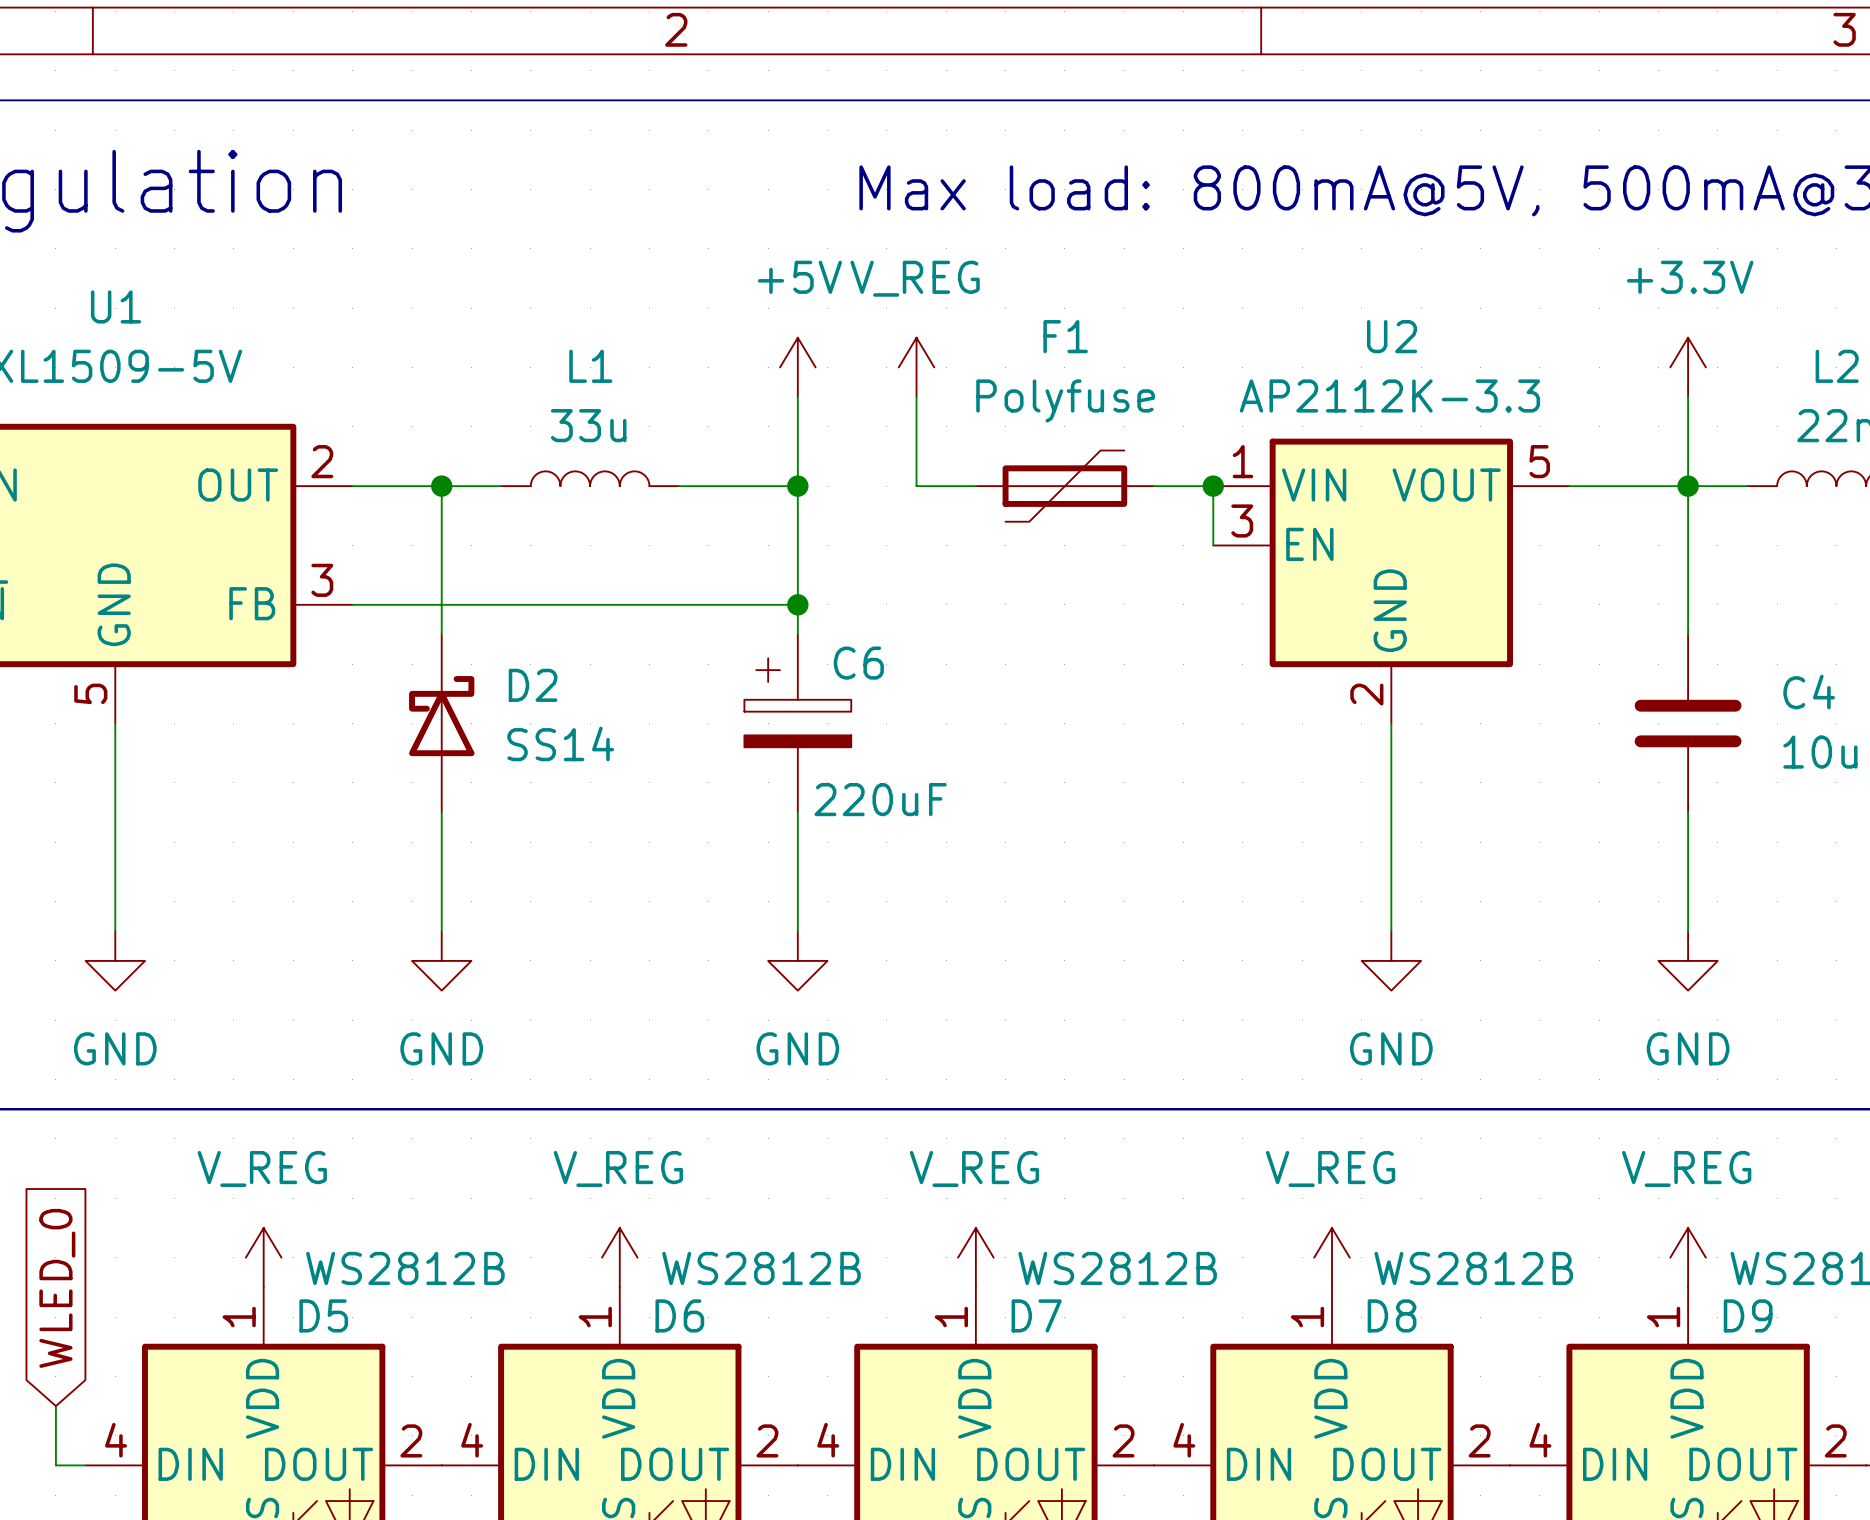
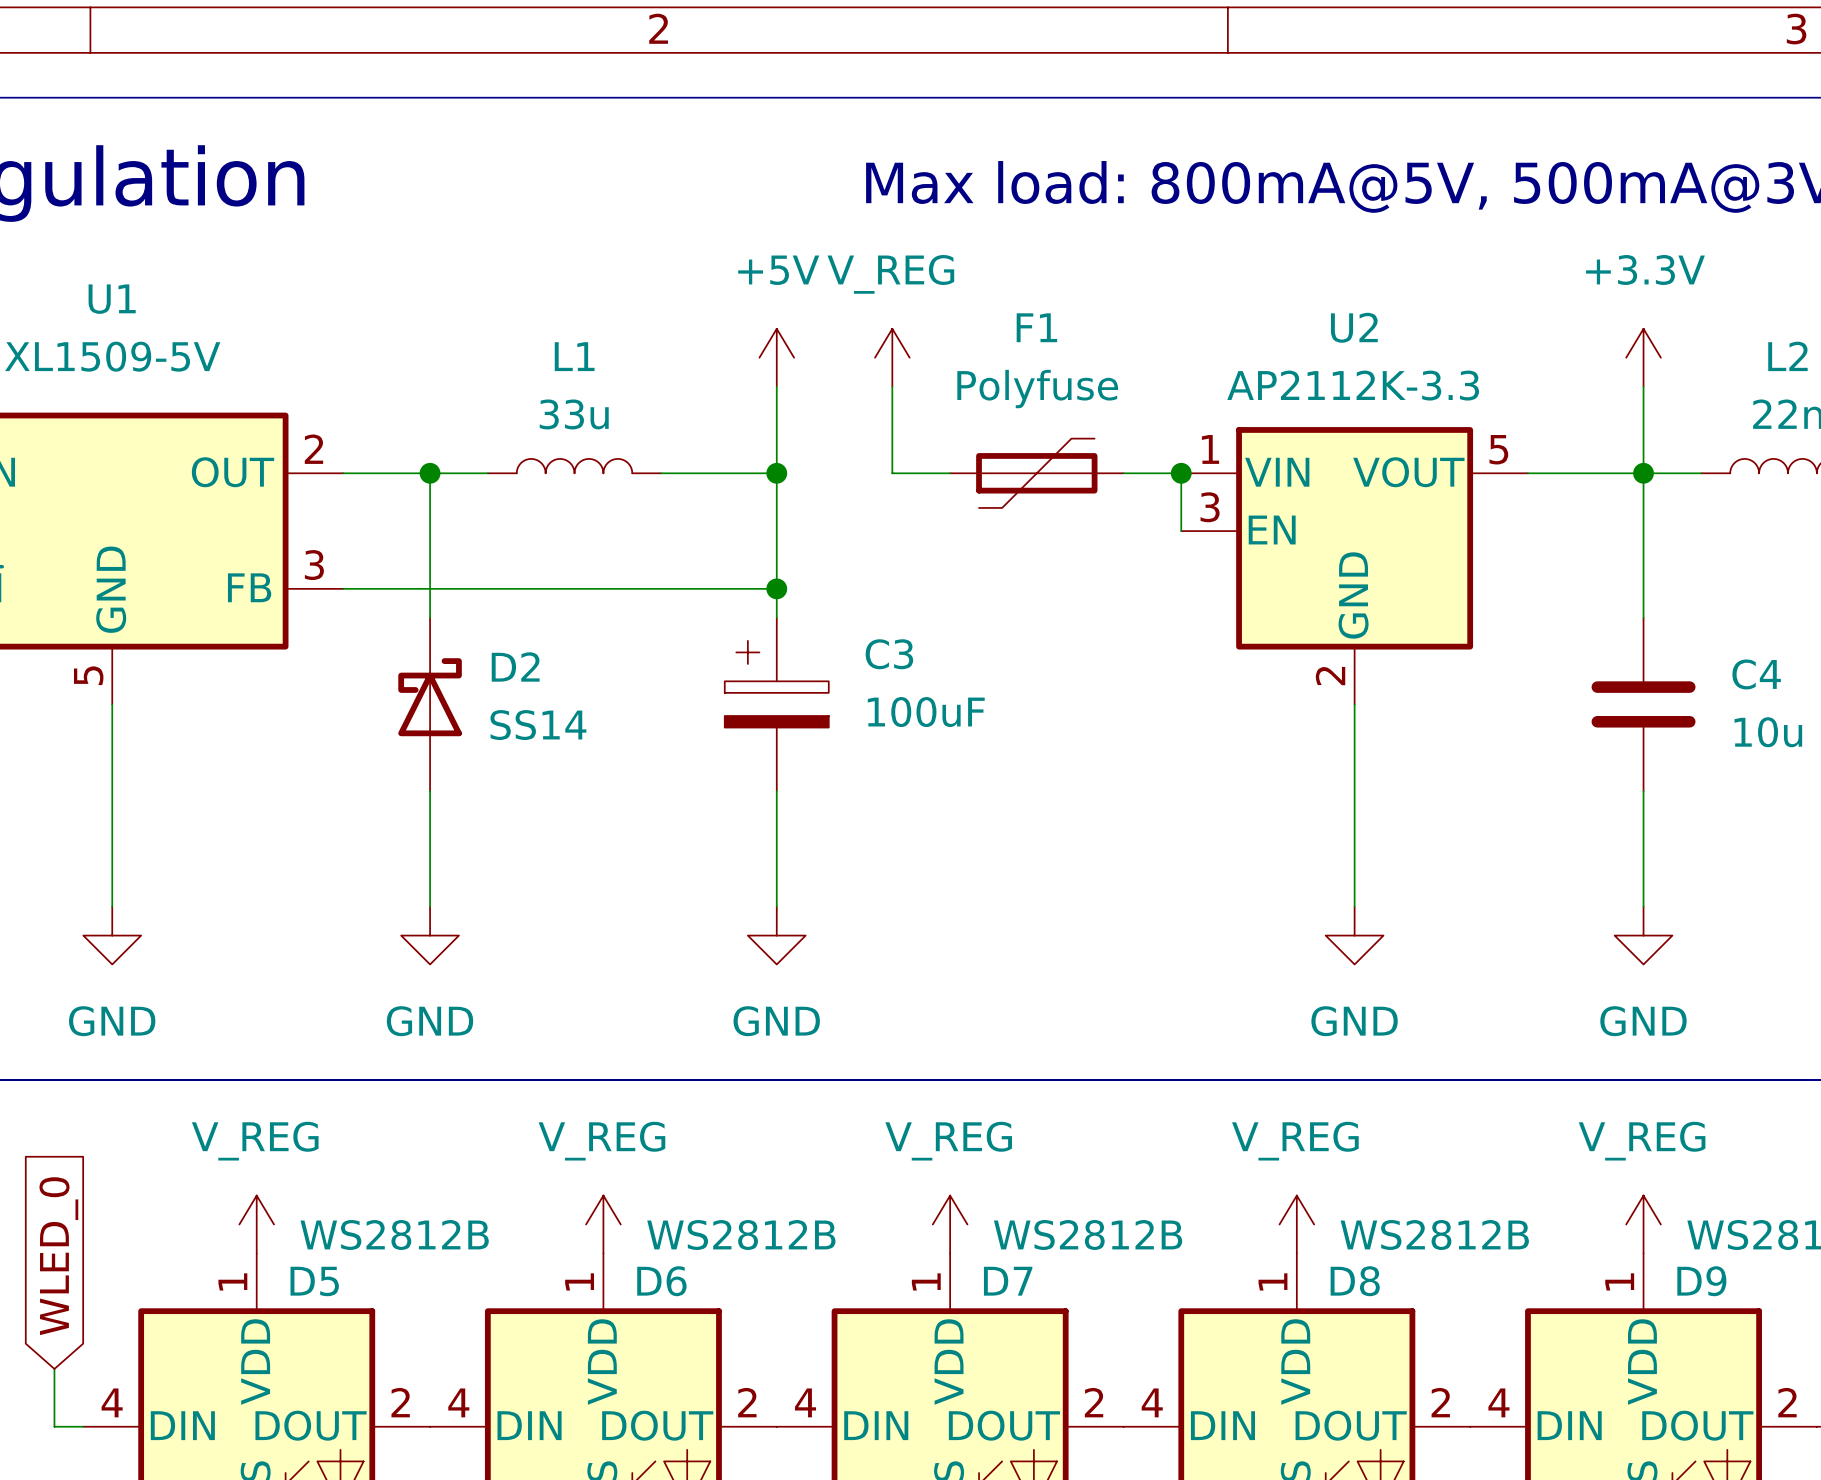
C6 name: C6 (858, 663) -> C3 (889, 654)
C6 value: 220uF (880, 799) -> 100uF (926, 712)

